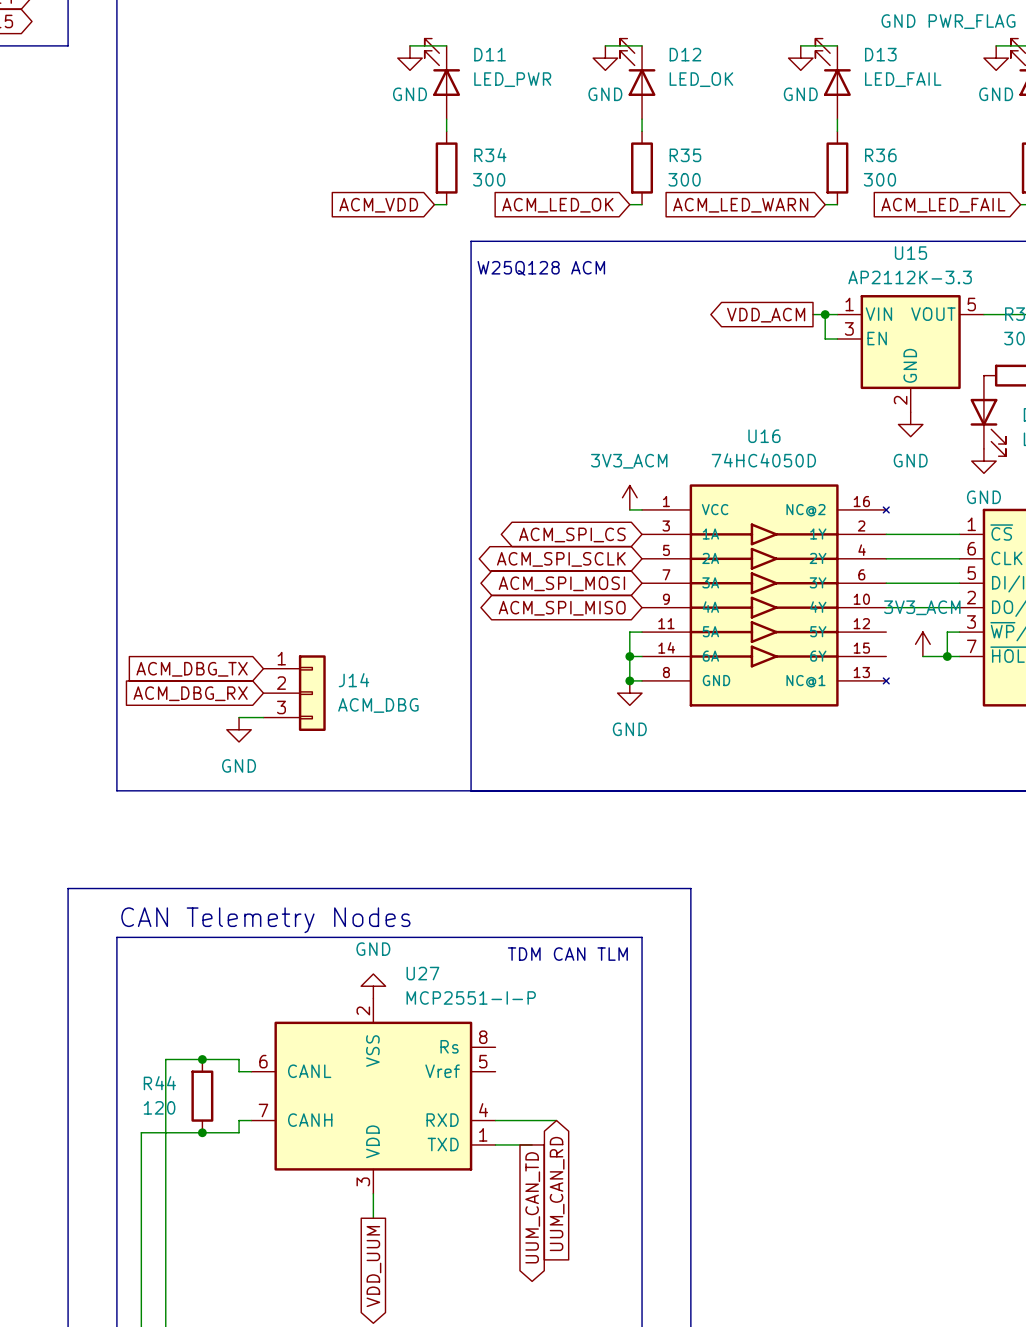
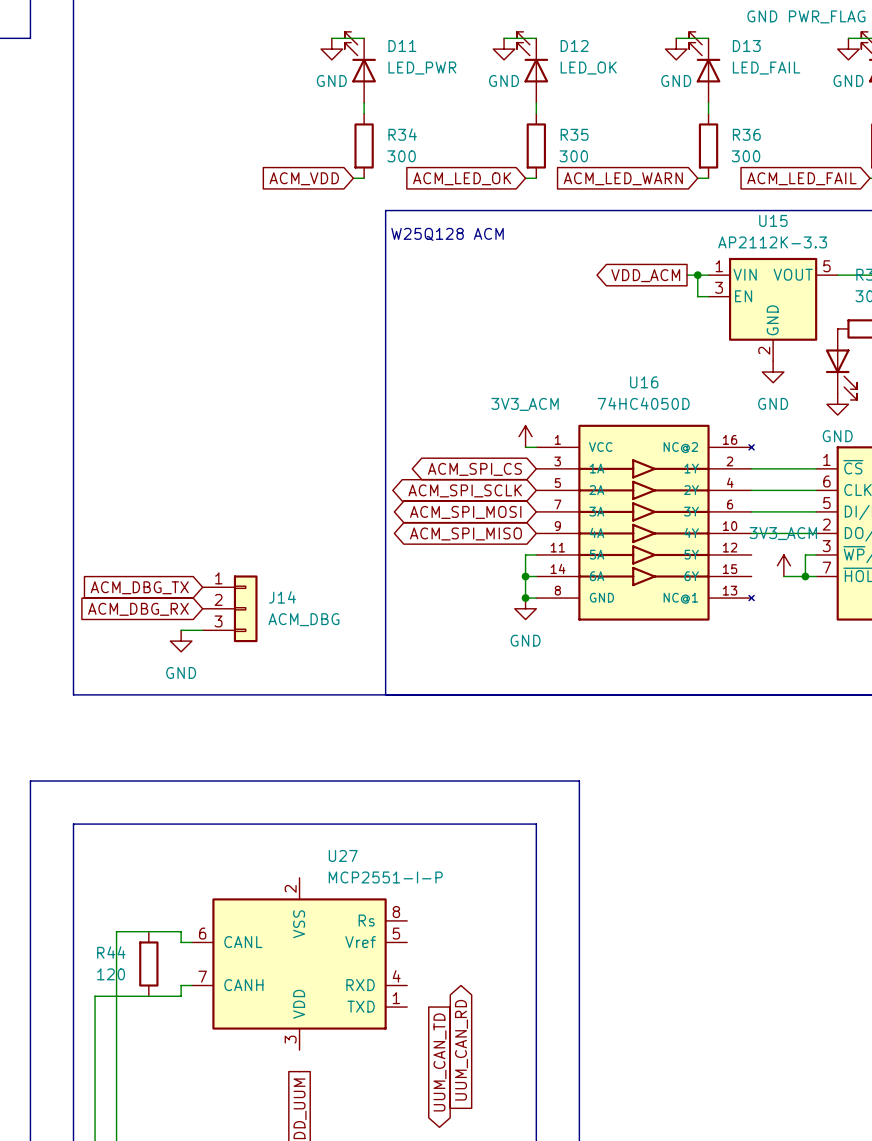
text: CAN Telemetry Nodes (265, 920) -> none
text: TDM CAN TLM (567, 954) -> none
power symbol: GND (373, 986) -> none
junction: (202, 1059) -> none
wire: (495, 1120) (556, 1120) -> none
junction: (202, 1132) -> none
wire: (495, 1144) (532, 1144) -> none
wire: (373, 1193) (373, 1218) -> none

